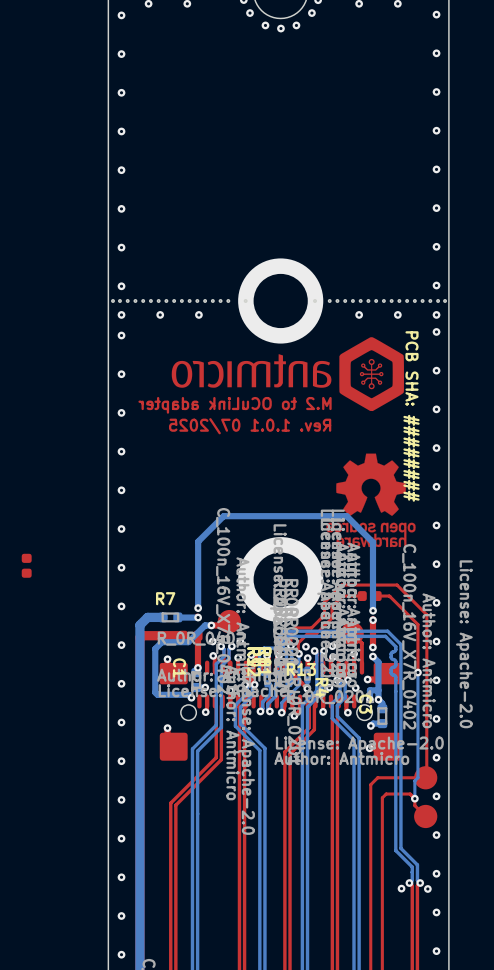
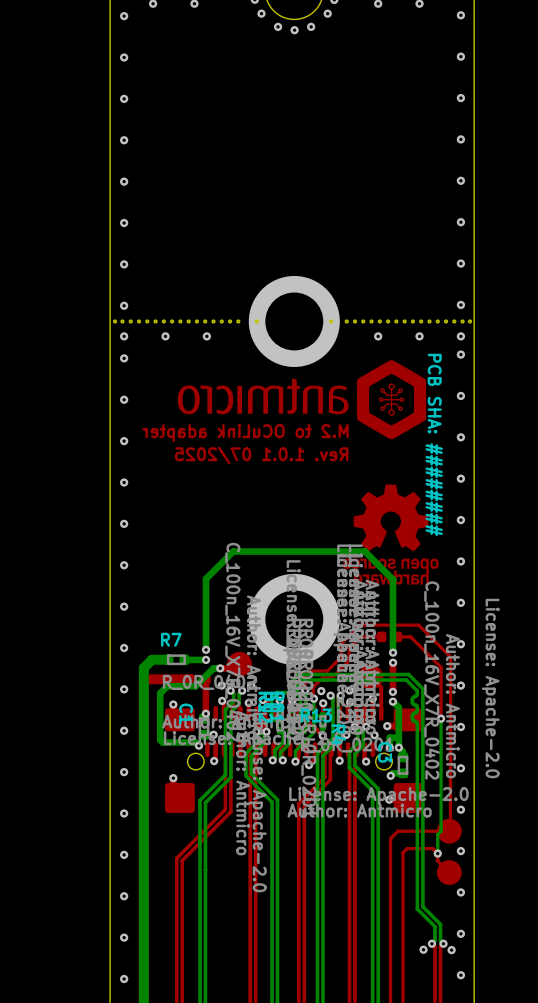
part: (26, 565) -> none

